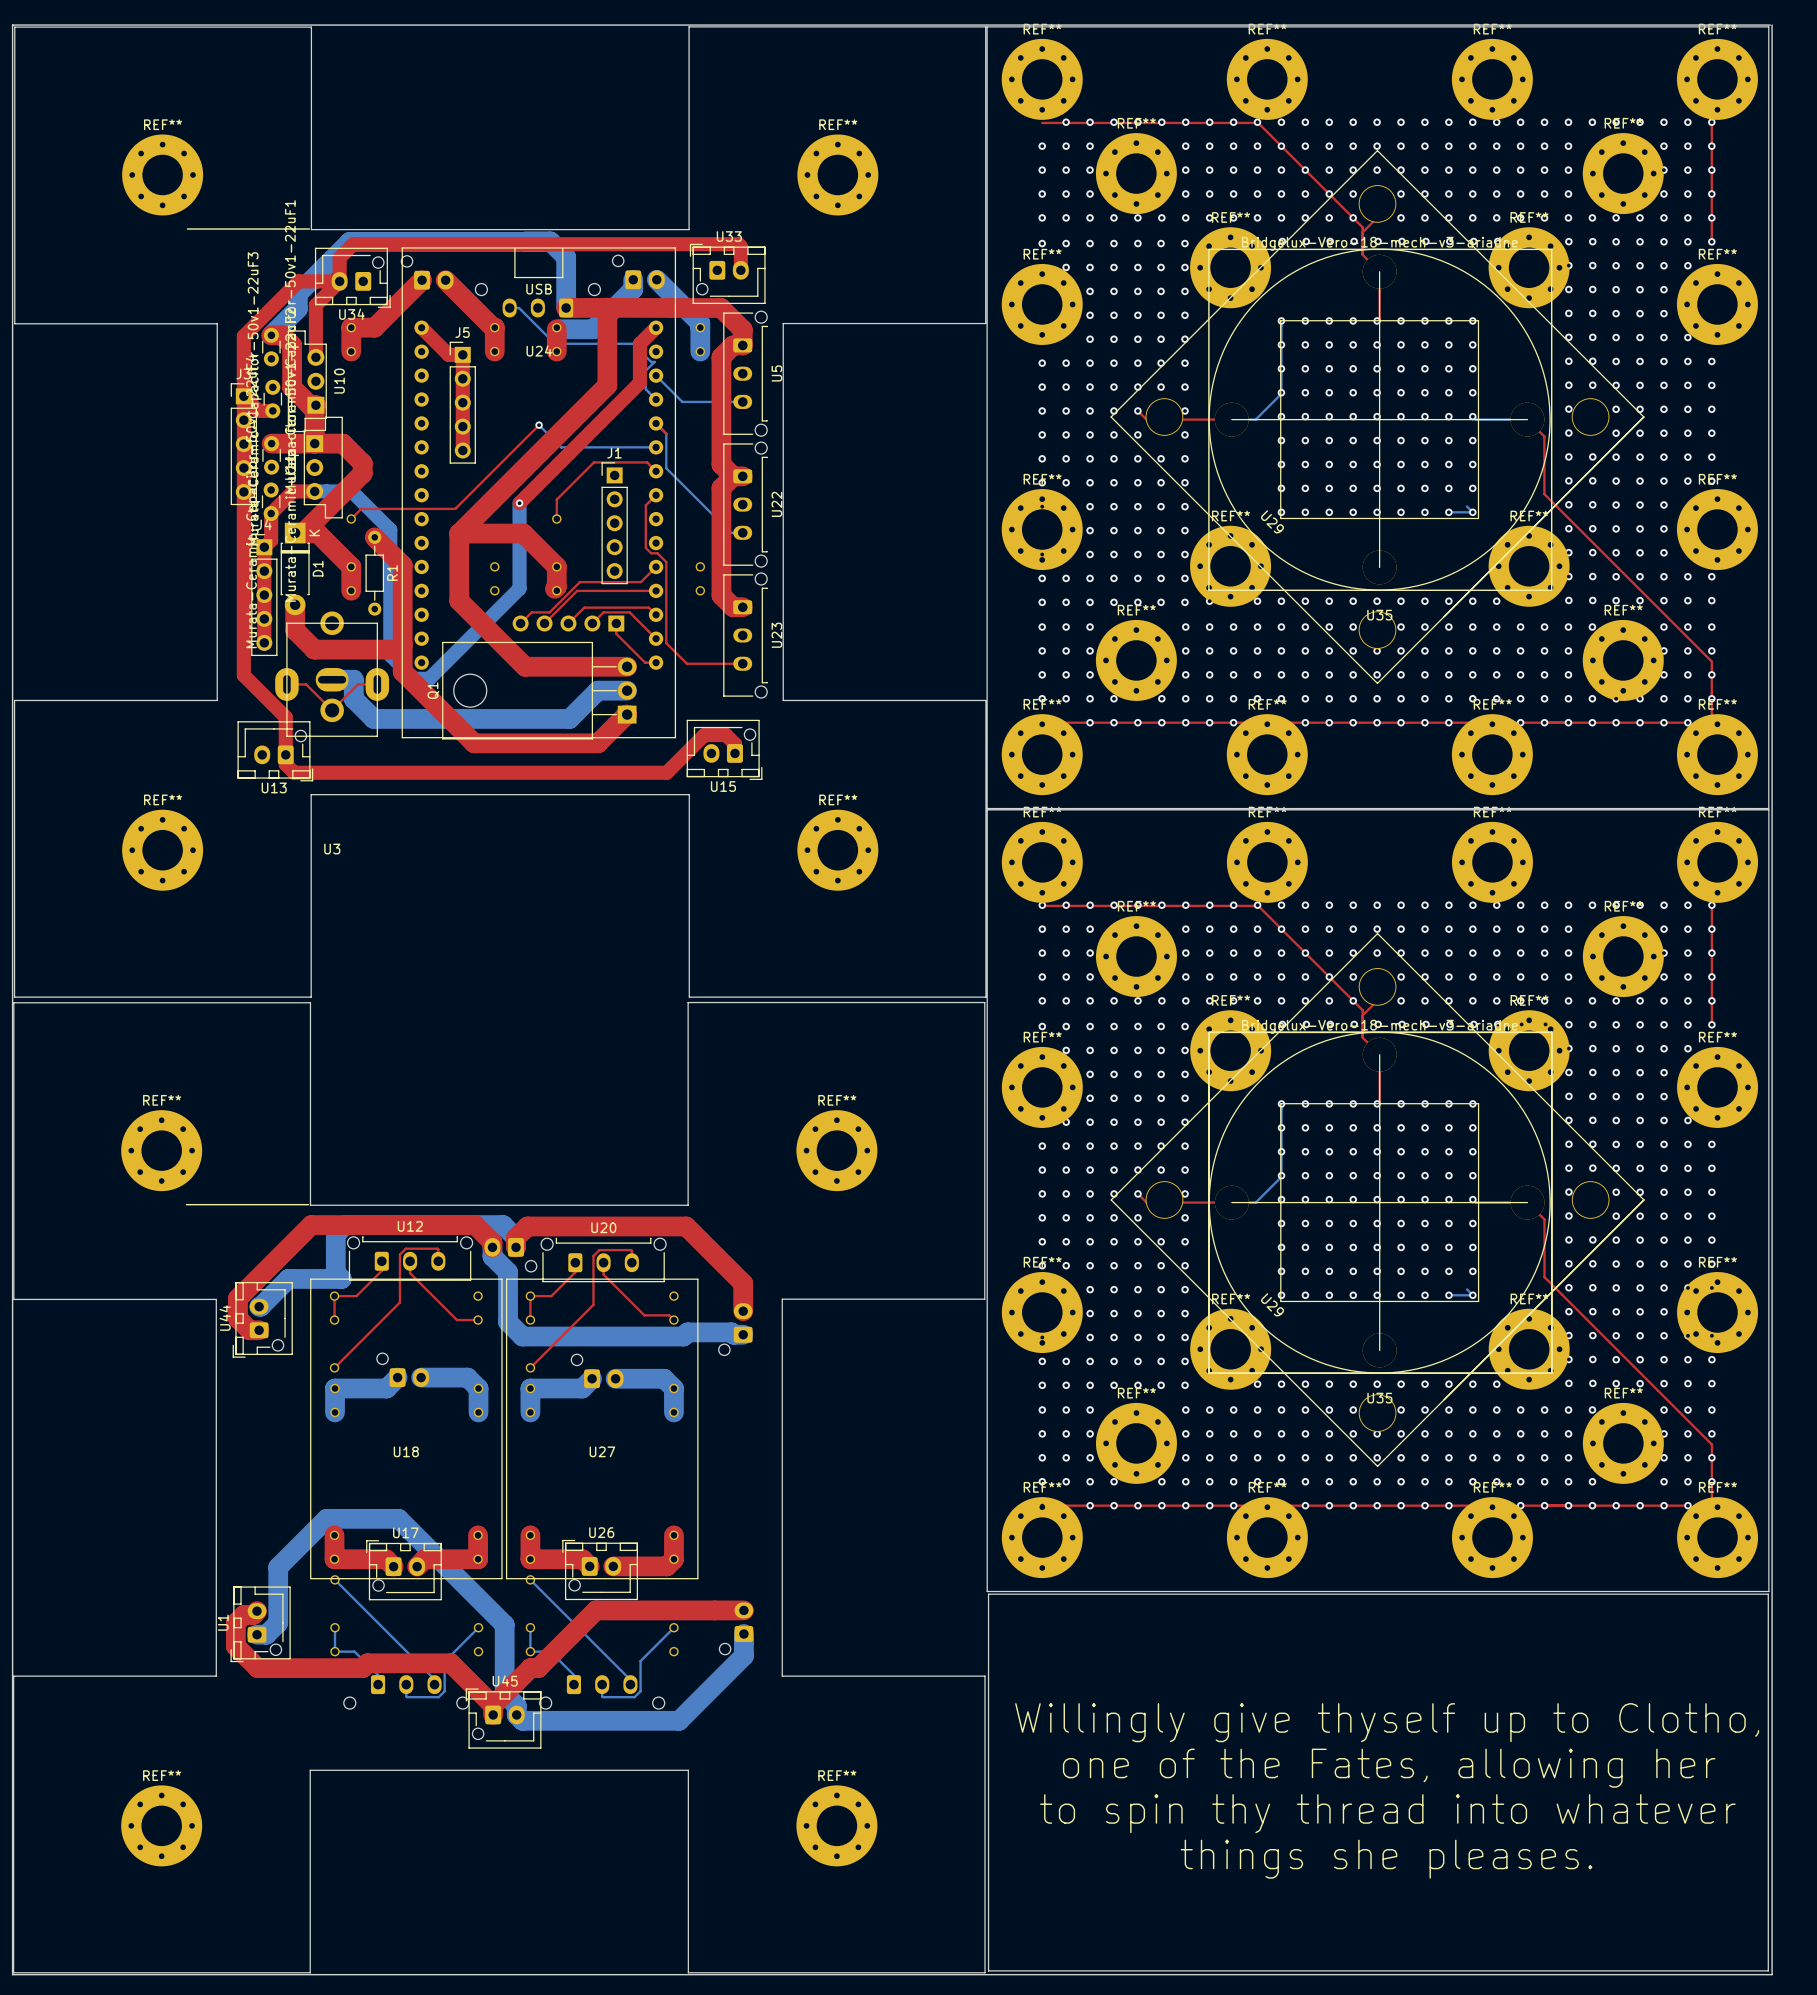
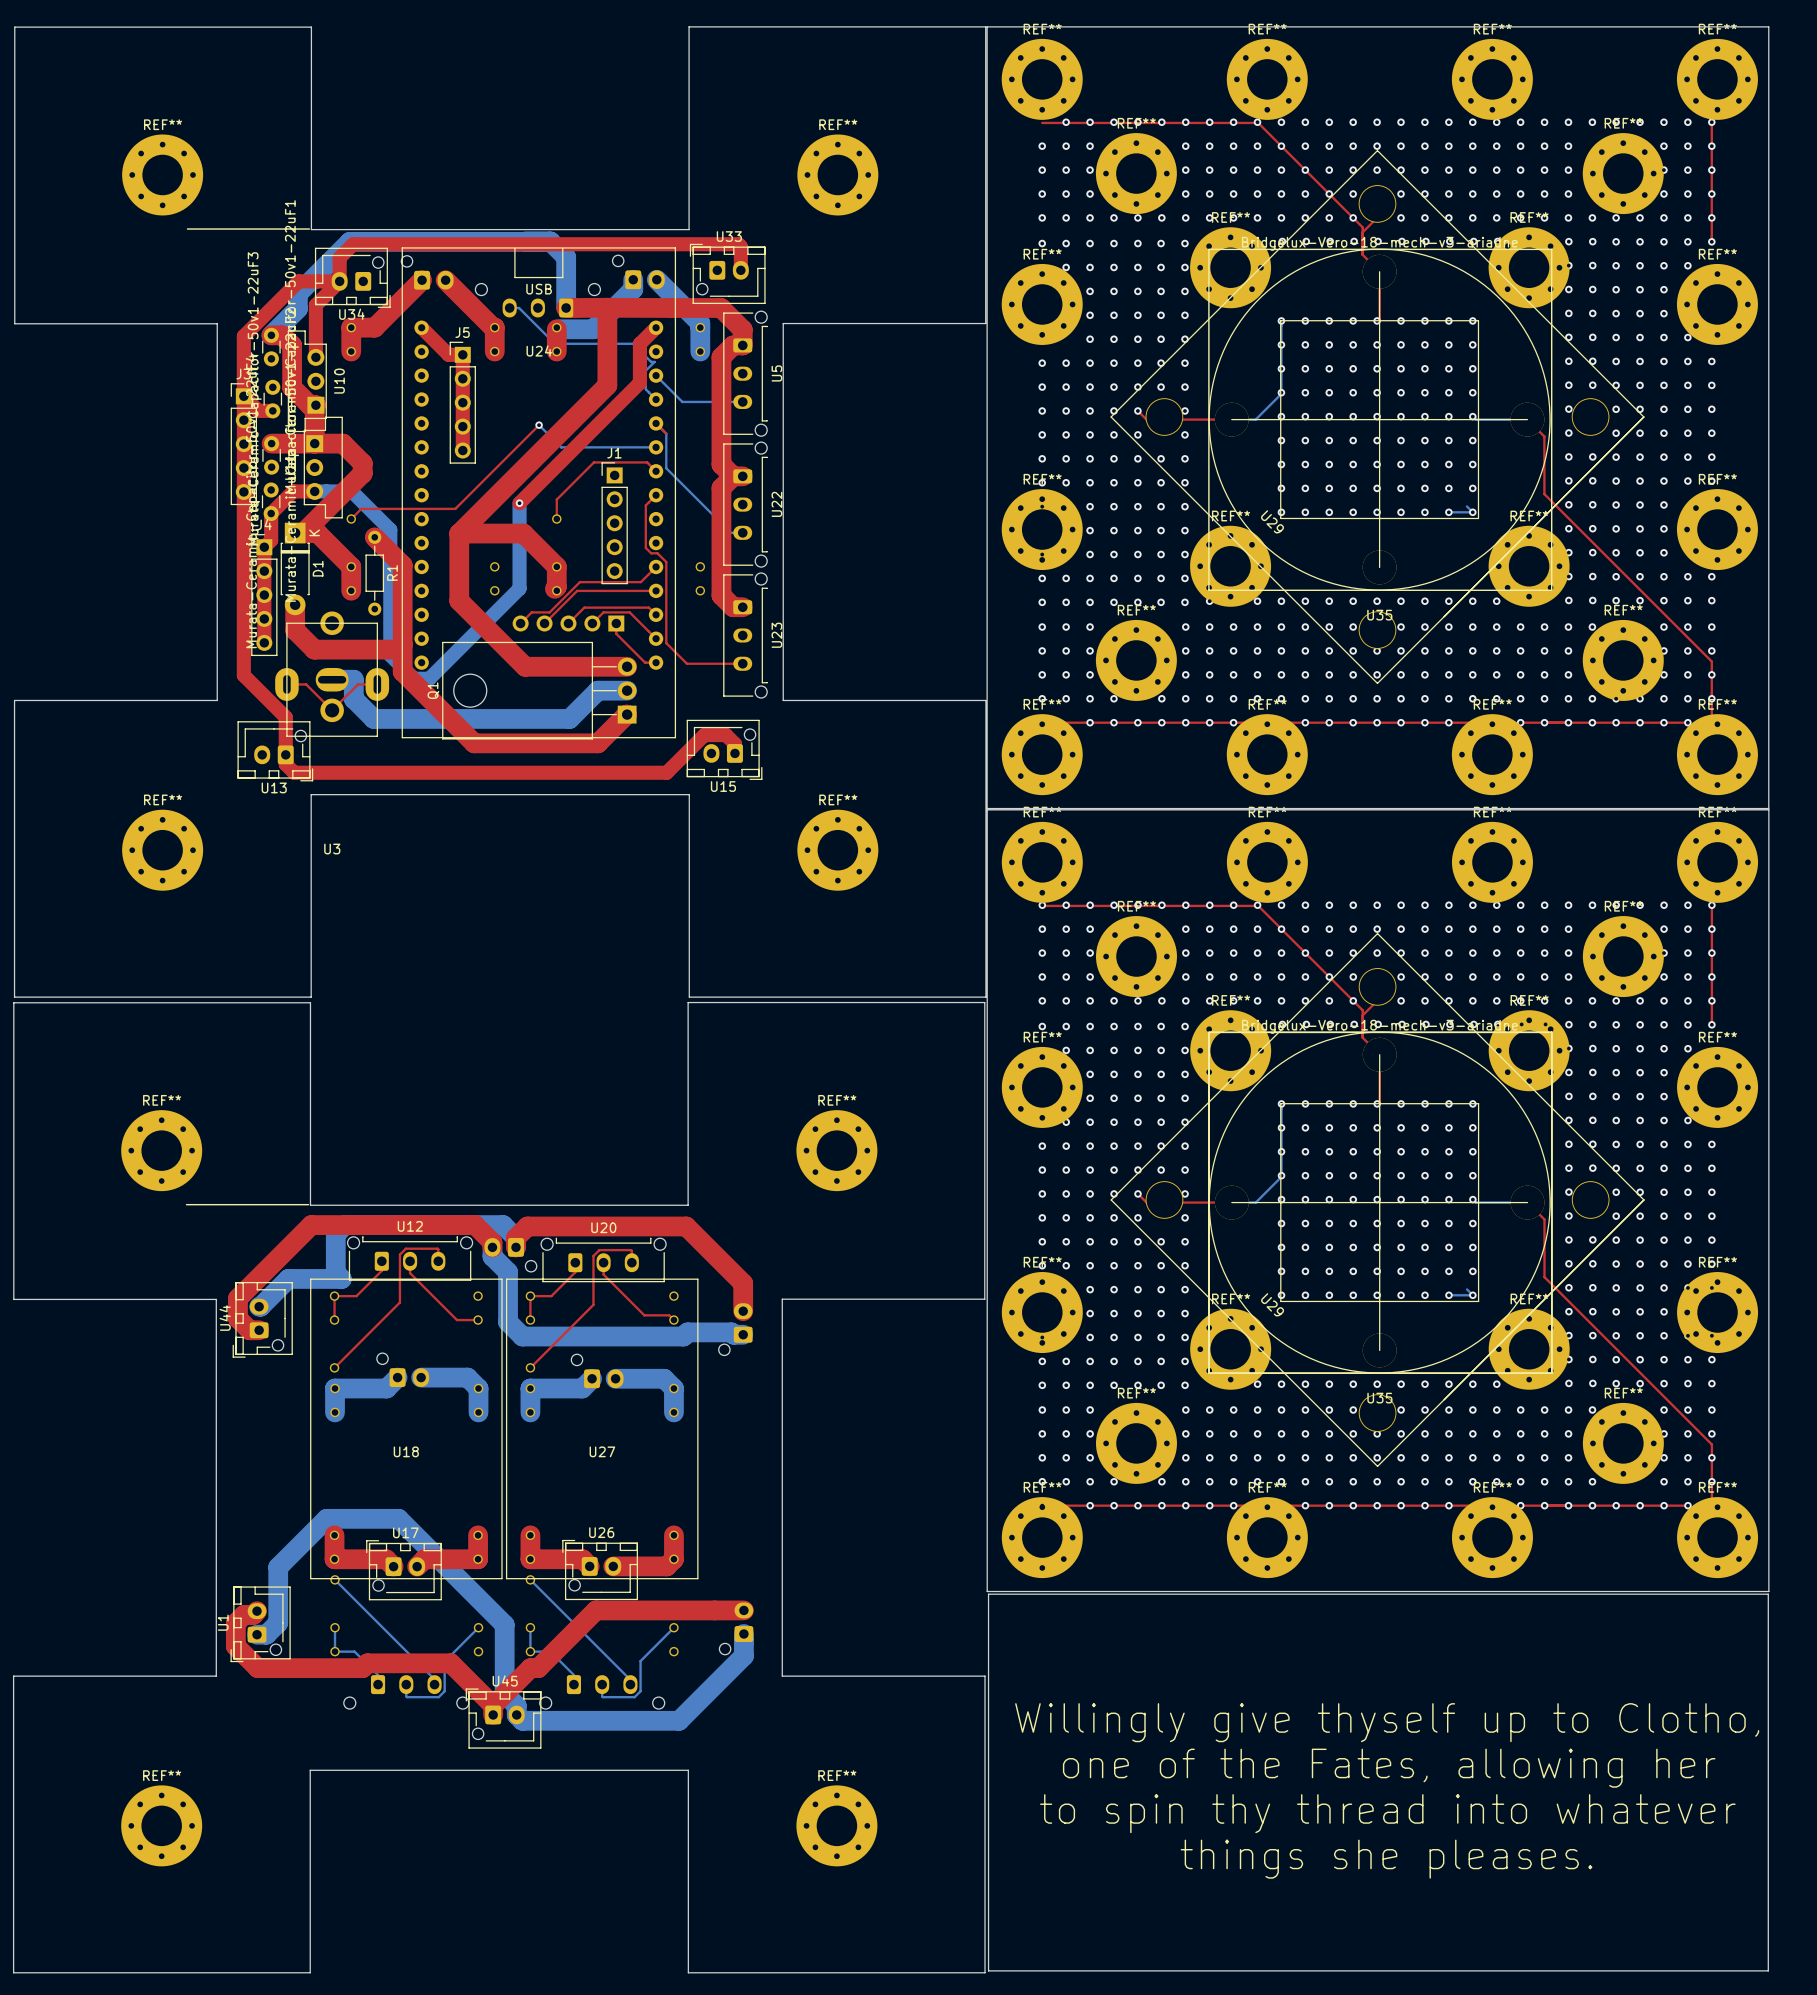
board edge: (1770, 25) (12, 25) (12, 1974) (1772, 1974) (1772, 25) -> none

